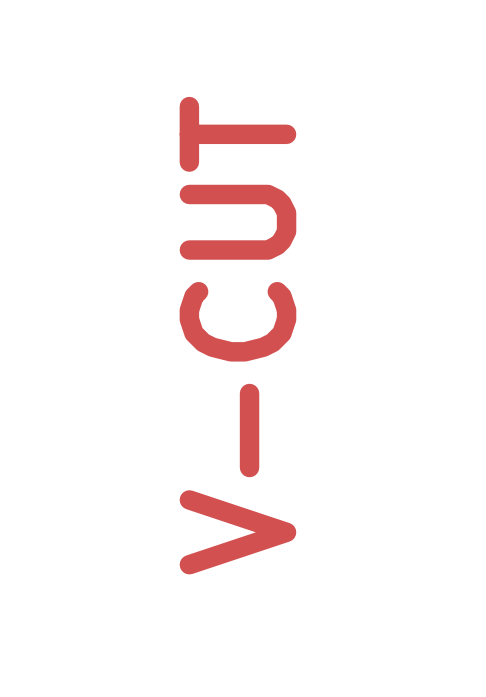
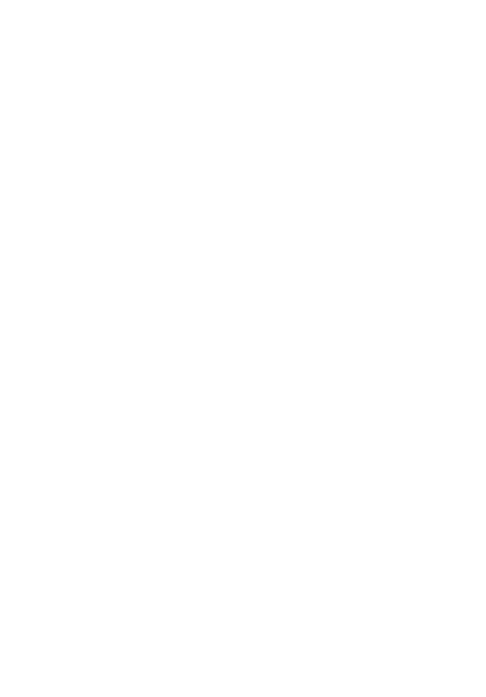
text: V-CUT (237, 335) -> none

